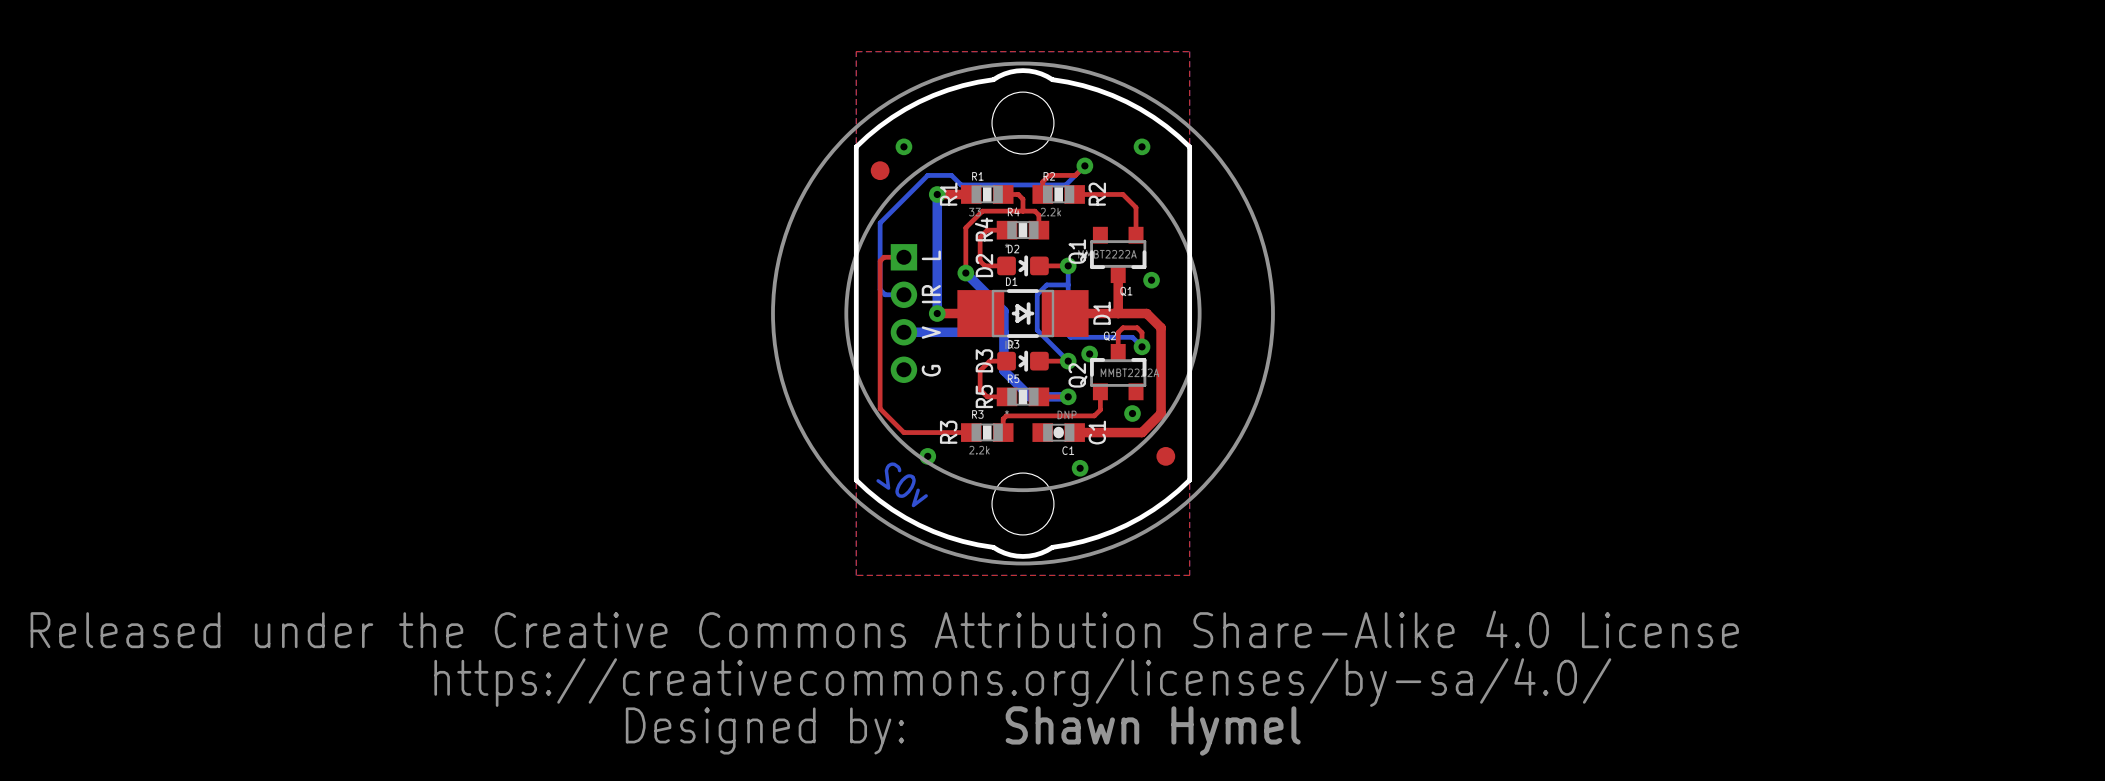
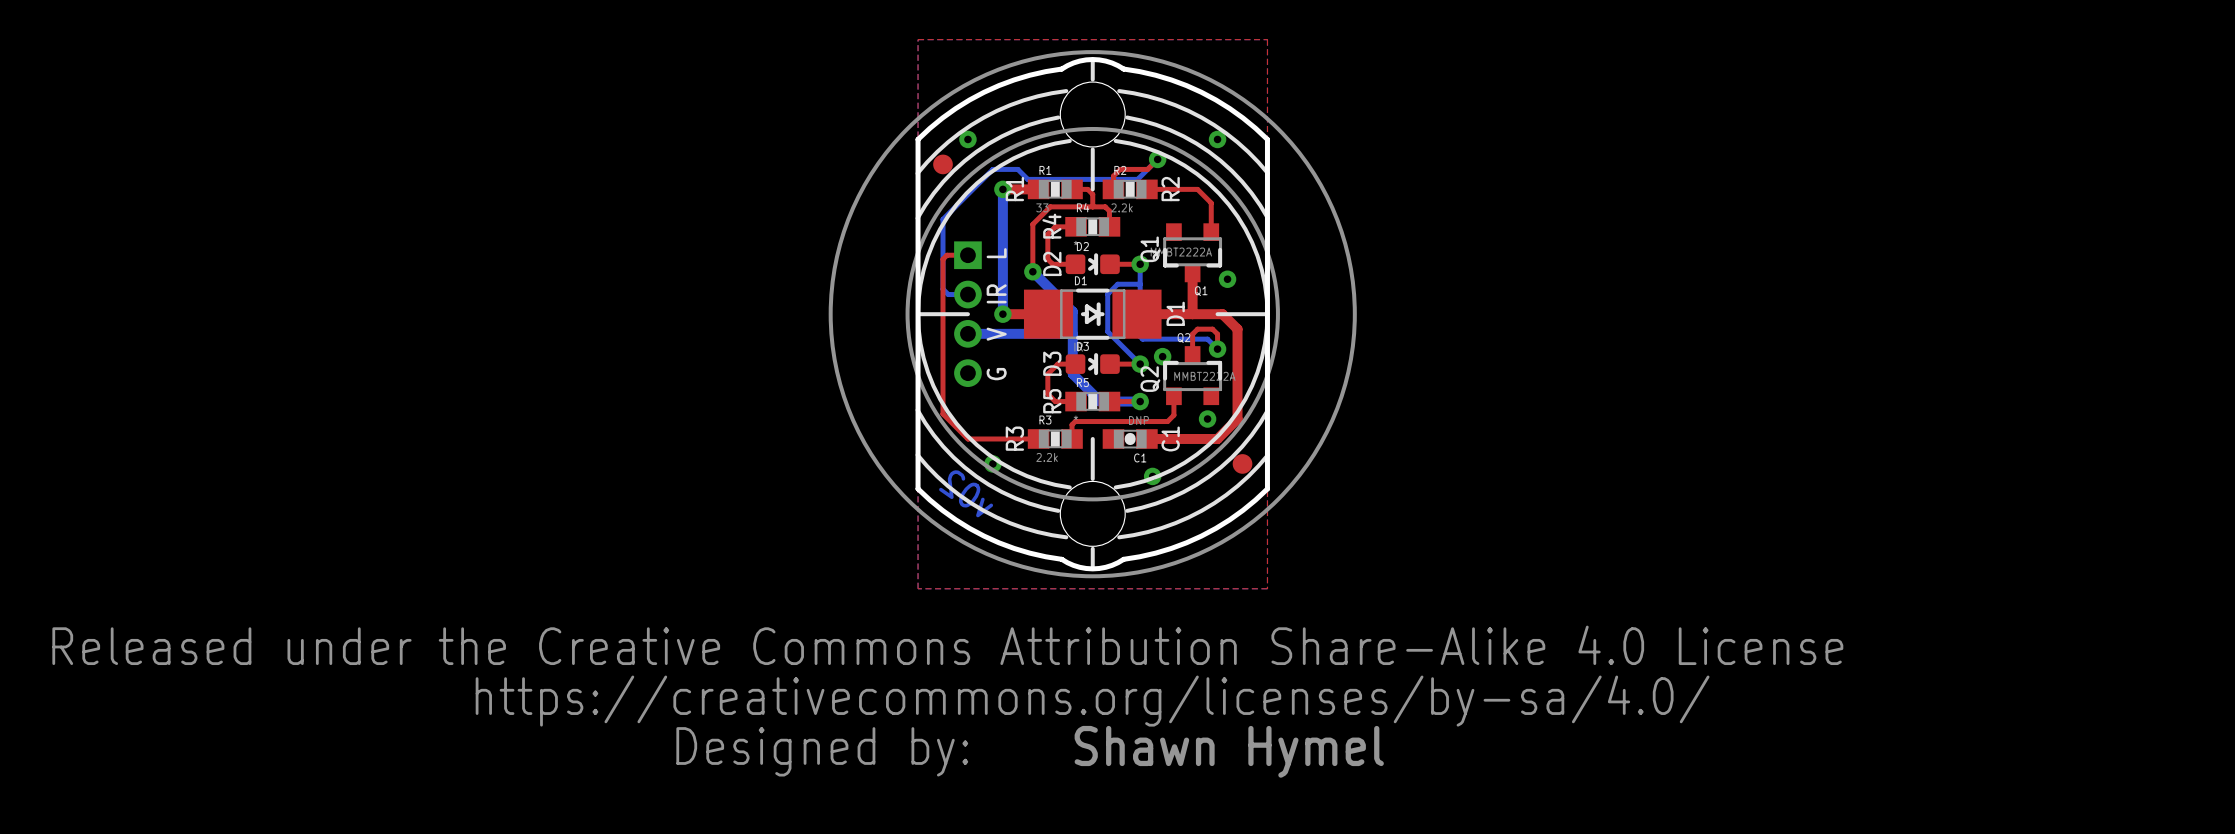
line: none -> (1092, 59) (1092, 79)
line: none -> (1066, 91) (1023, 100) (983, 117) (947, 142) (917, 173)
line: none -> (1119, 91) (1161, 100) (1201, 117) (1237, 142) (1267, 173)
line: none -> (1058, 117) (1015, 130) (976, 151) (943, 181) (917, 218)
line: none -> (1127, 117) (1170, 130) (1209, 151) (1242, 181) (1267, 218)
line: none -> (1069, 140) (1040, 147) (1013, 158) (988, 174) (966, 193) (940, 229) (927, 256) (920, 284) (918, 314) (920, 343) (927, 372) (940, 399) (966, 434) (988, 454) (1013, 469) (1040, 481) (1069, 487)
line: none -> (1115, 140) (1144, 147) (1171, 158) (1197, 174) (1219, 193) (1245, 229) (1257, 256) (1264, 284) (1267, 314) (1264, 343) (1257, 372) (1245, 399) (1219, 434) (1197, 454) (1171, 469) (1144, 481) (1115, 487)
line: none -> (1092, 149) (1092, 189)
line: none -> (918, 314) (967, 314)
line: none -> (1217, 314) (1267, 314)
line: none -> (917, 410) (943, 446) (976, 476) (1015, 498) (1058, 510)
line: none -> (1267, 410) (1242, 446) (1209, 476) (1170, 498) (1127, 510)
line: none -> (1092, 438) (1092, 478)
line: none -> (917, 454) (947, 486) (983, 510) (1023, 528) (1066, 537)
line: none -> (1267, 454) (1237, 486) (1201, 510) (1161, 528) (1119, 537)
line: none -> (1092, 548) (1092, 568)

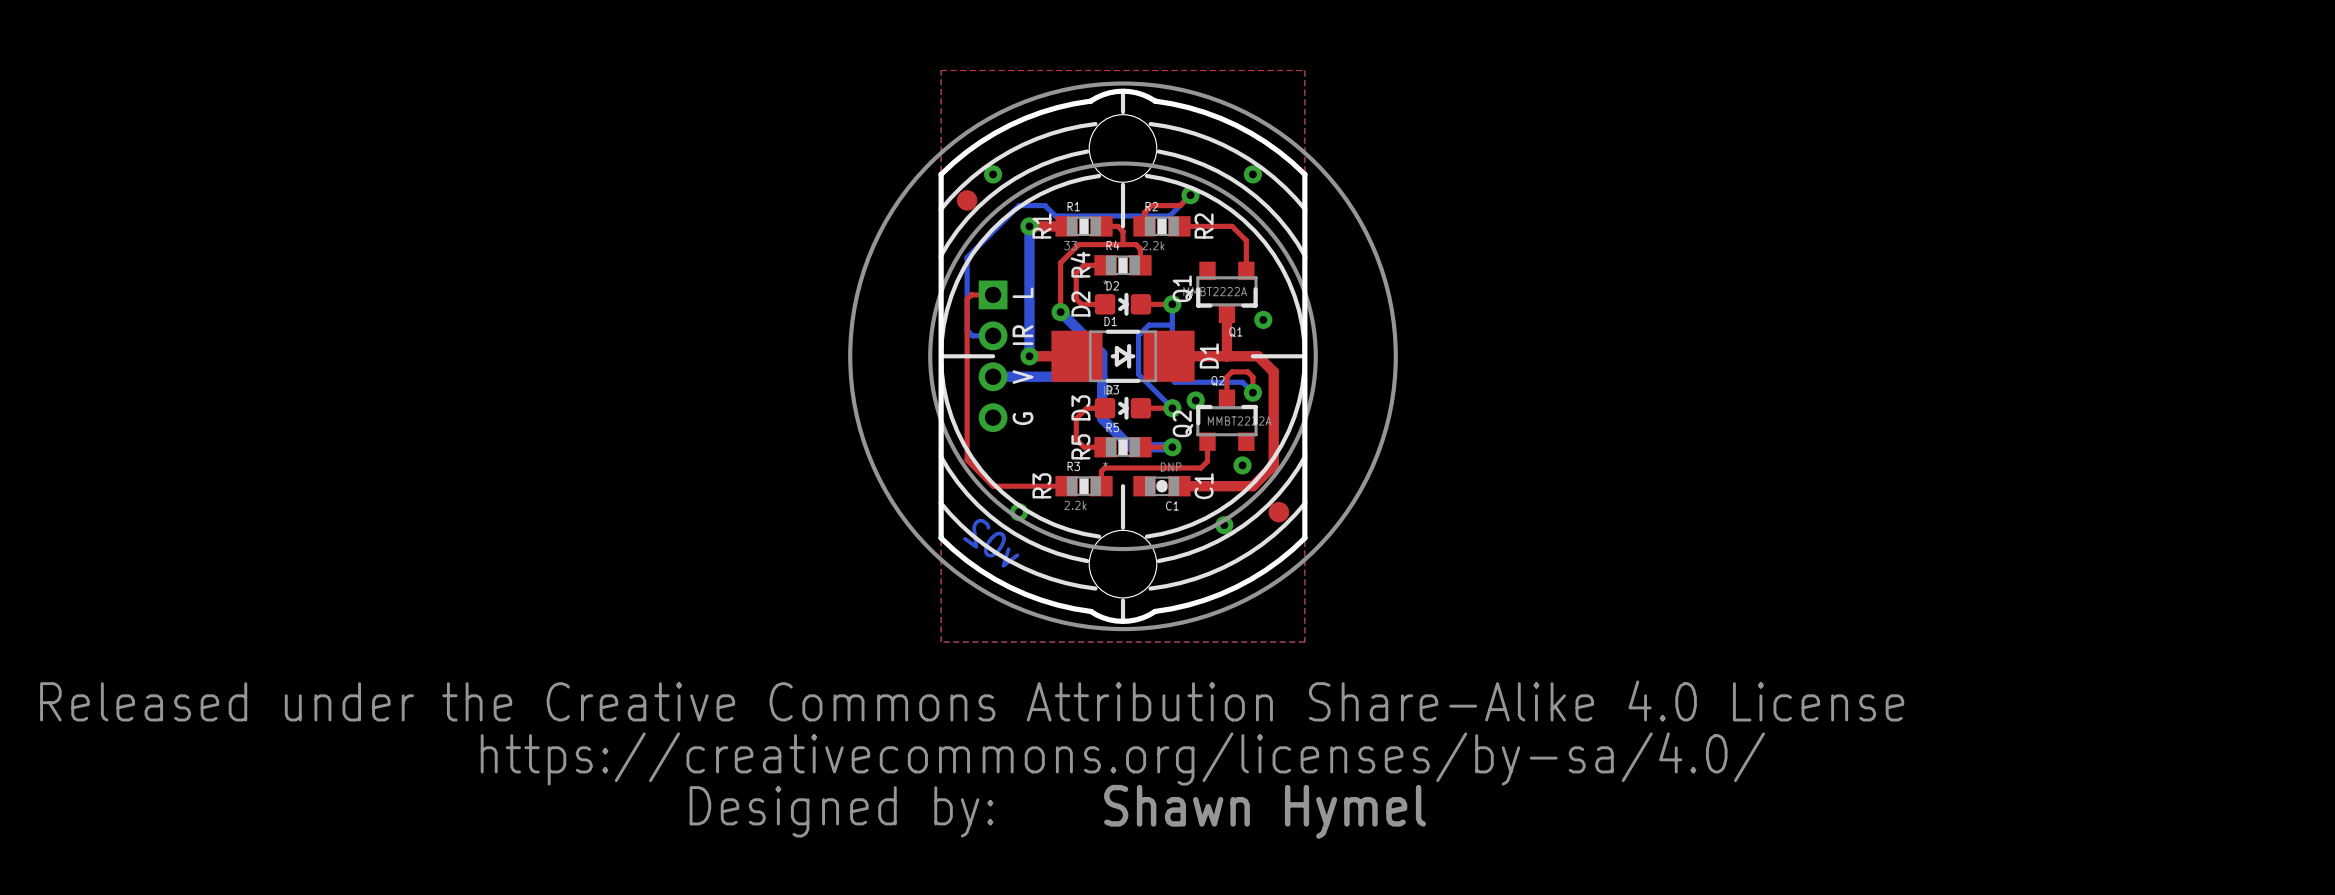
via position: (1152, 476) -> (1224, 525)

